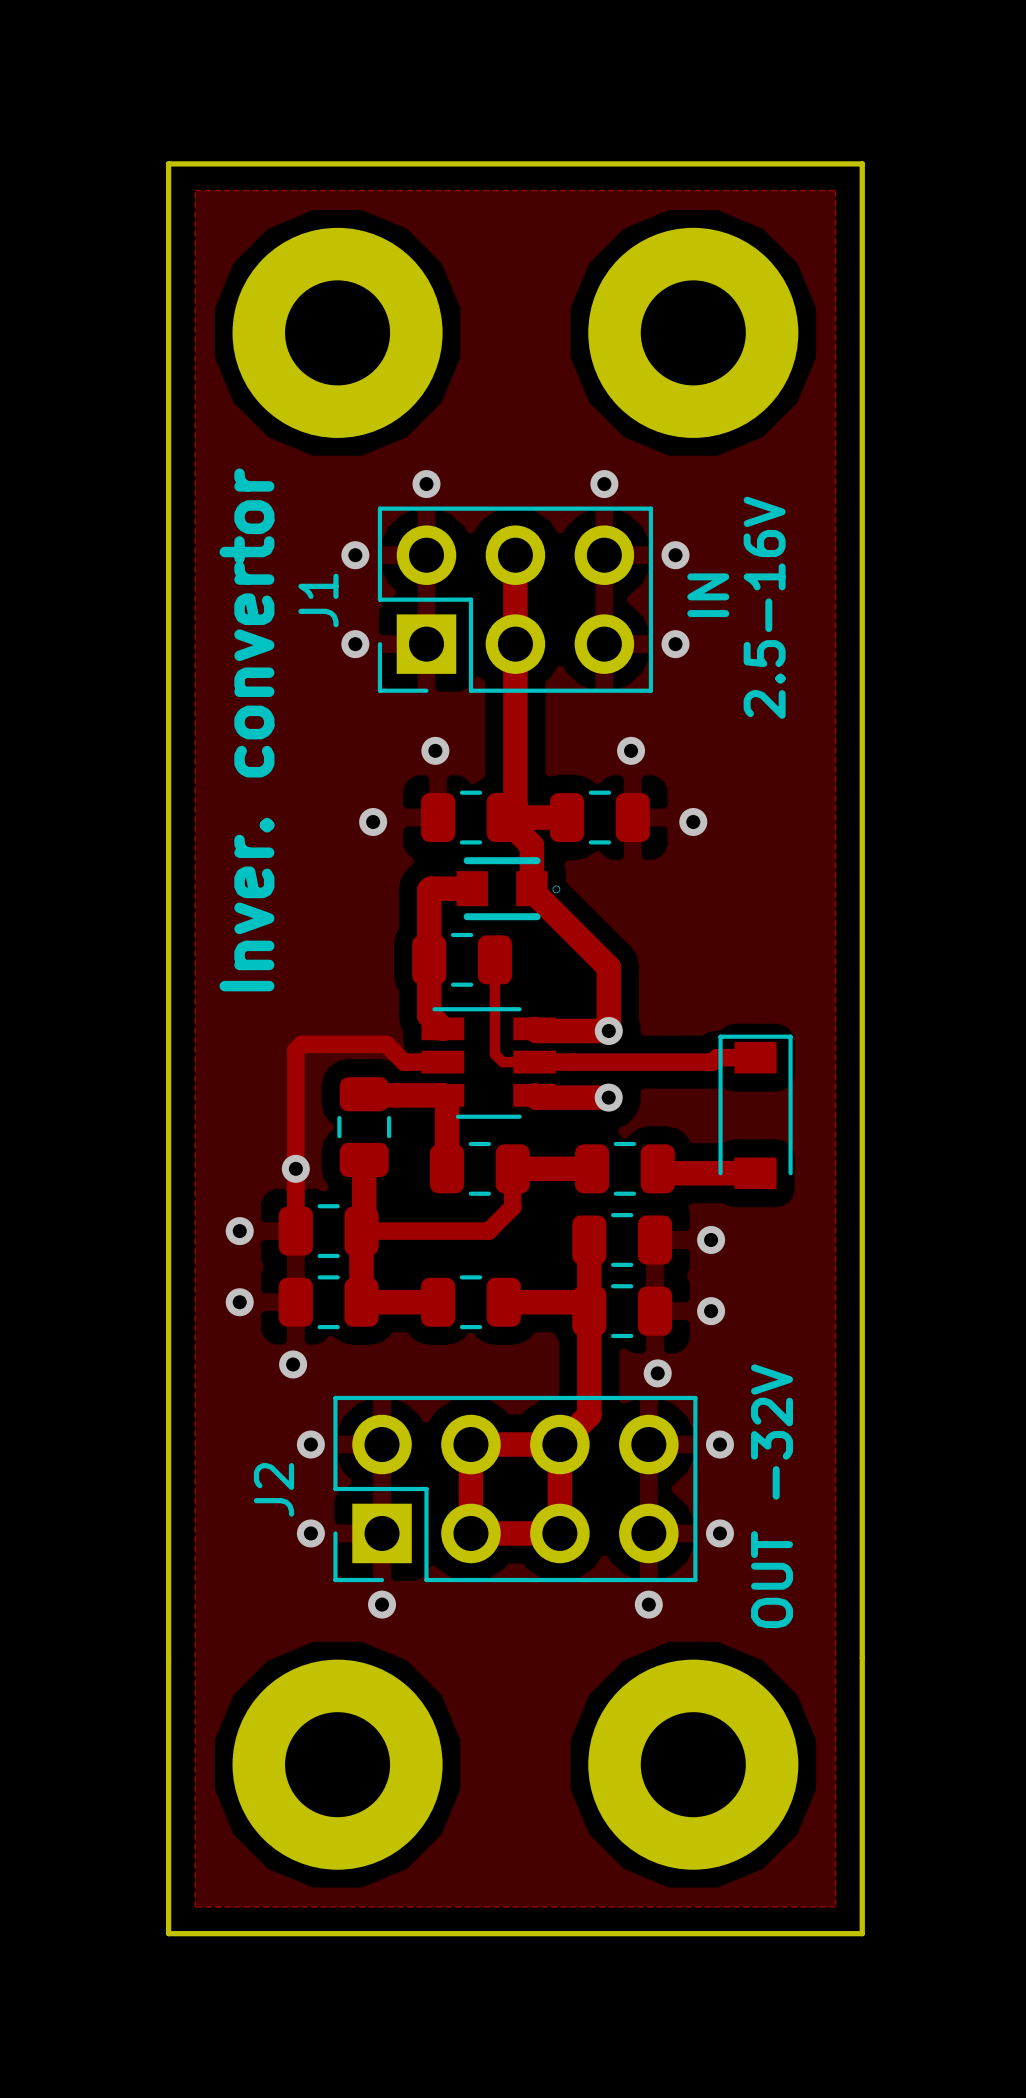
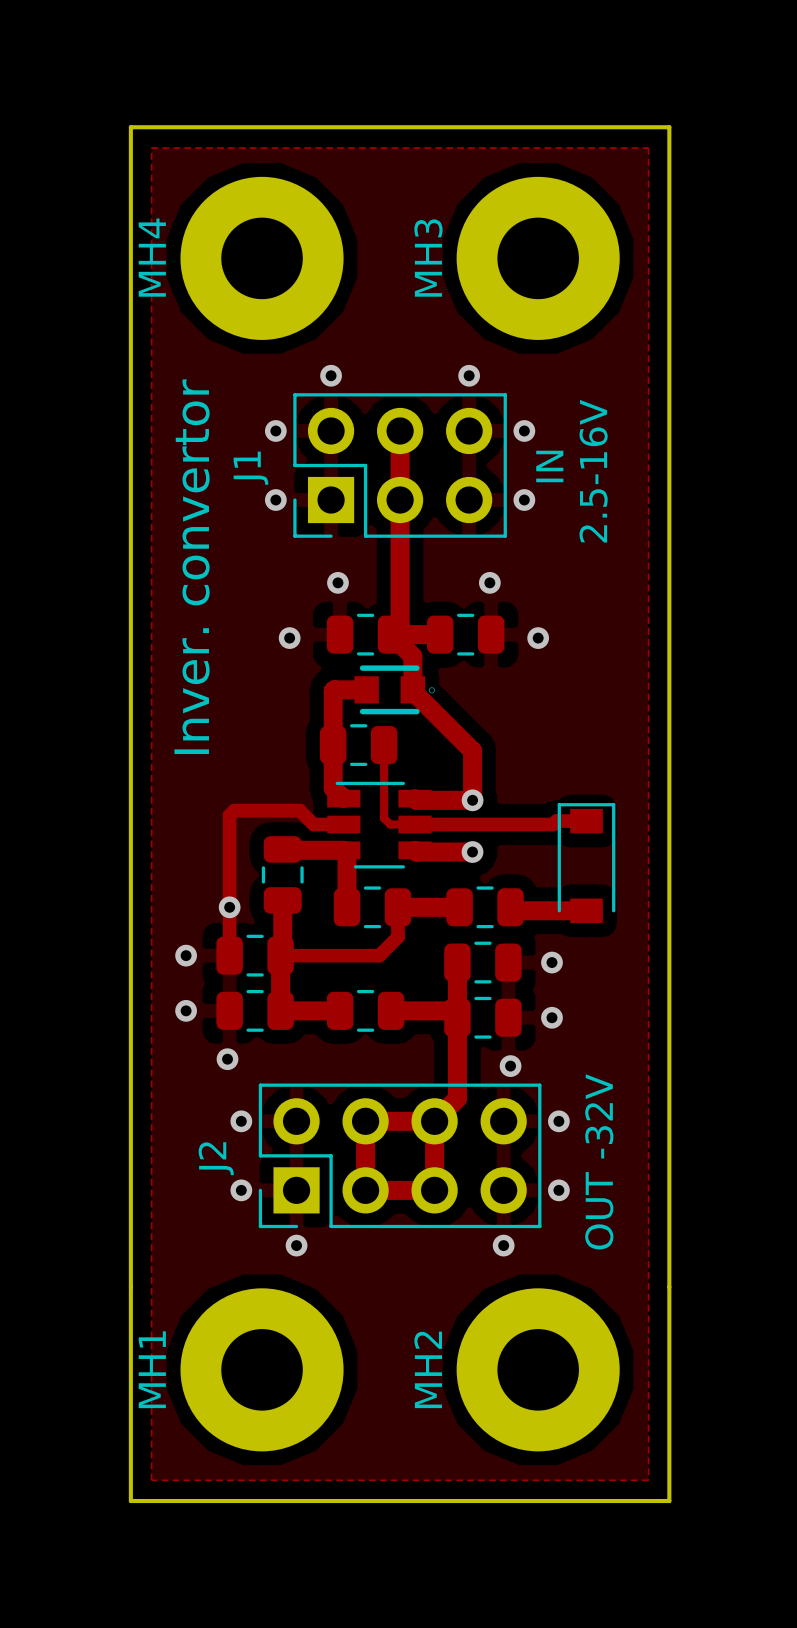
MH4 name: none -> MH4 (152, 257)
MH3 name: none -> MH3 (428, 258)
MH1 name: none -> MH1 (152, 1369)
MH2 name: none -> MH2 (428, 1369)

